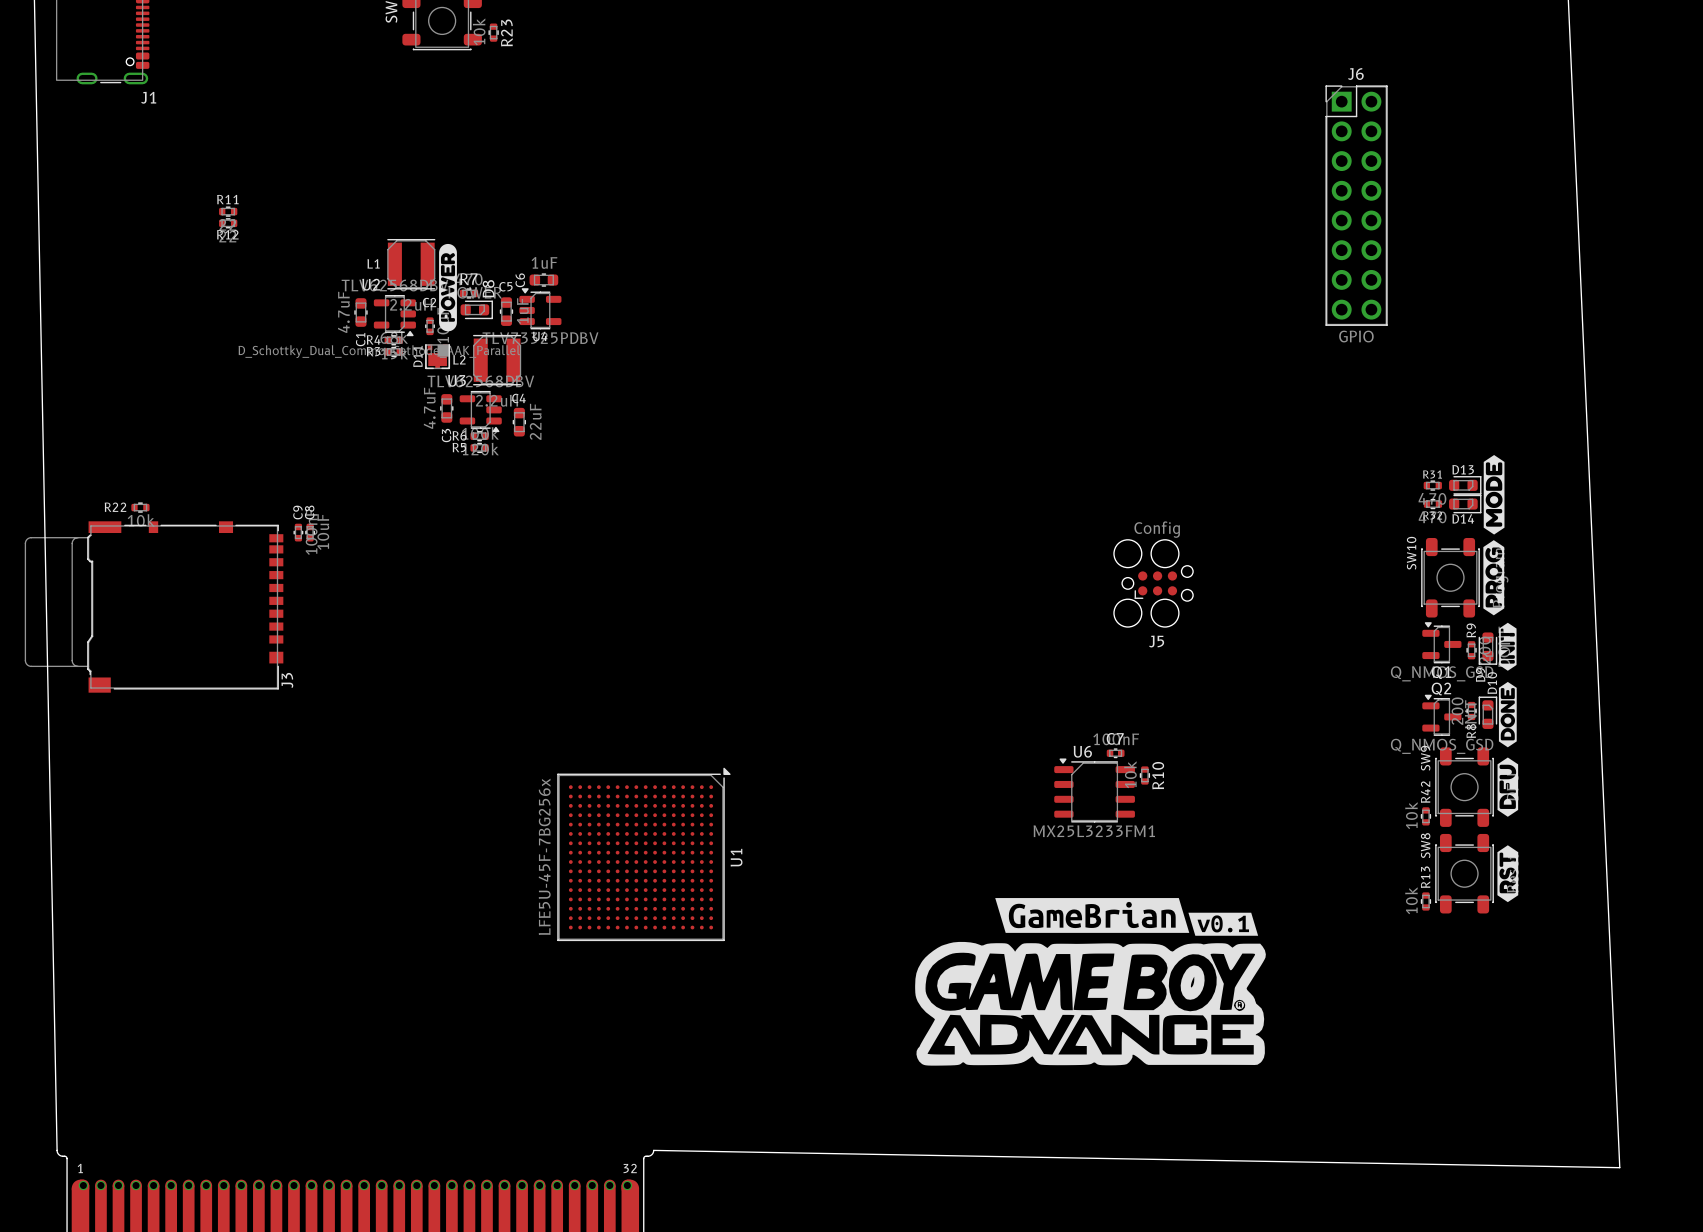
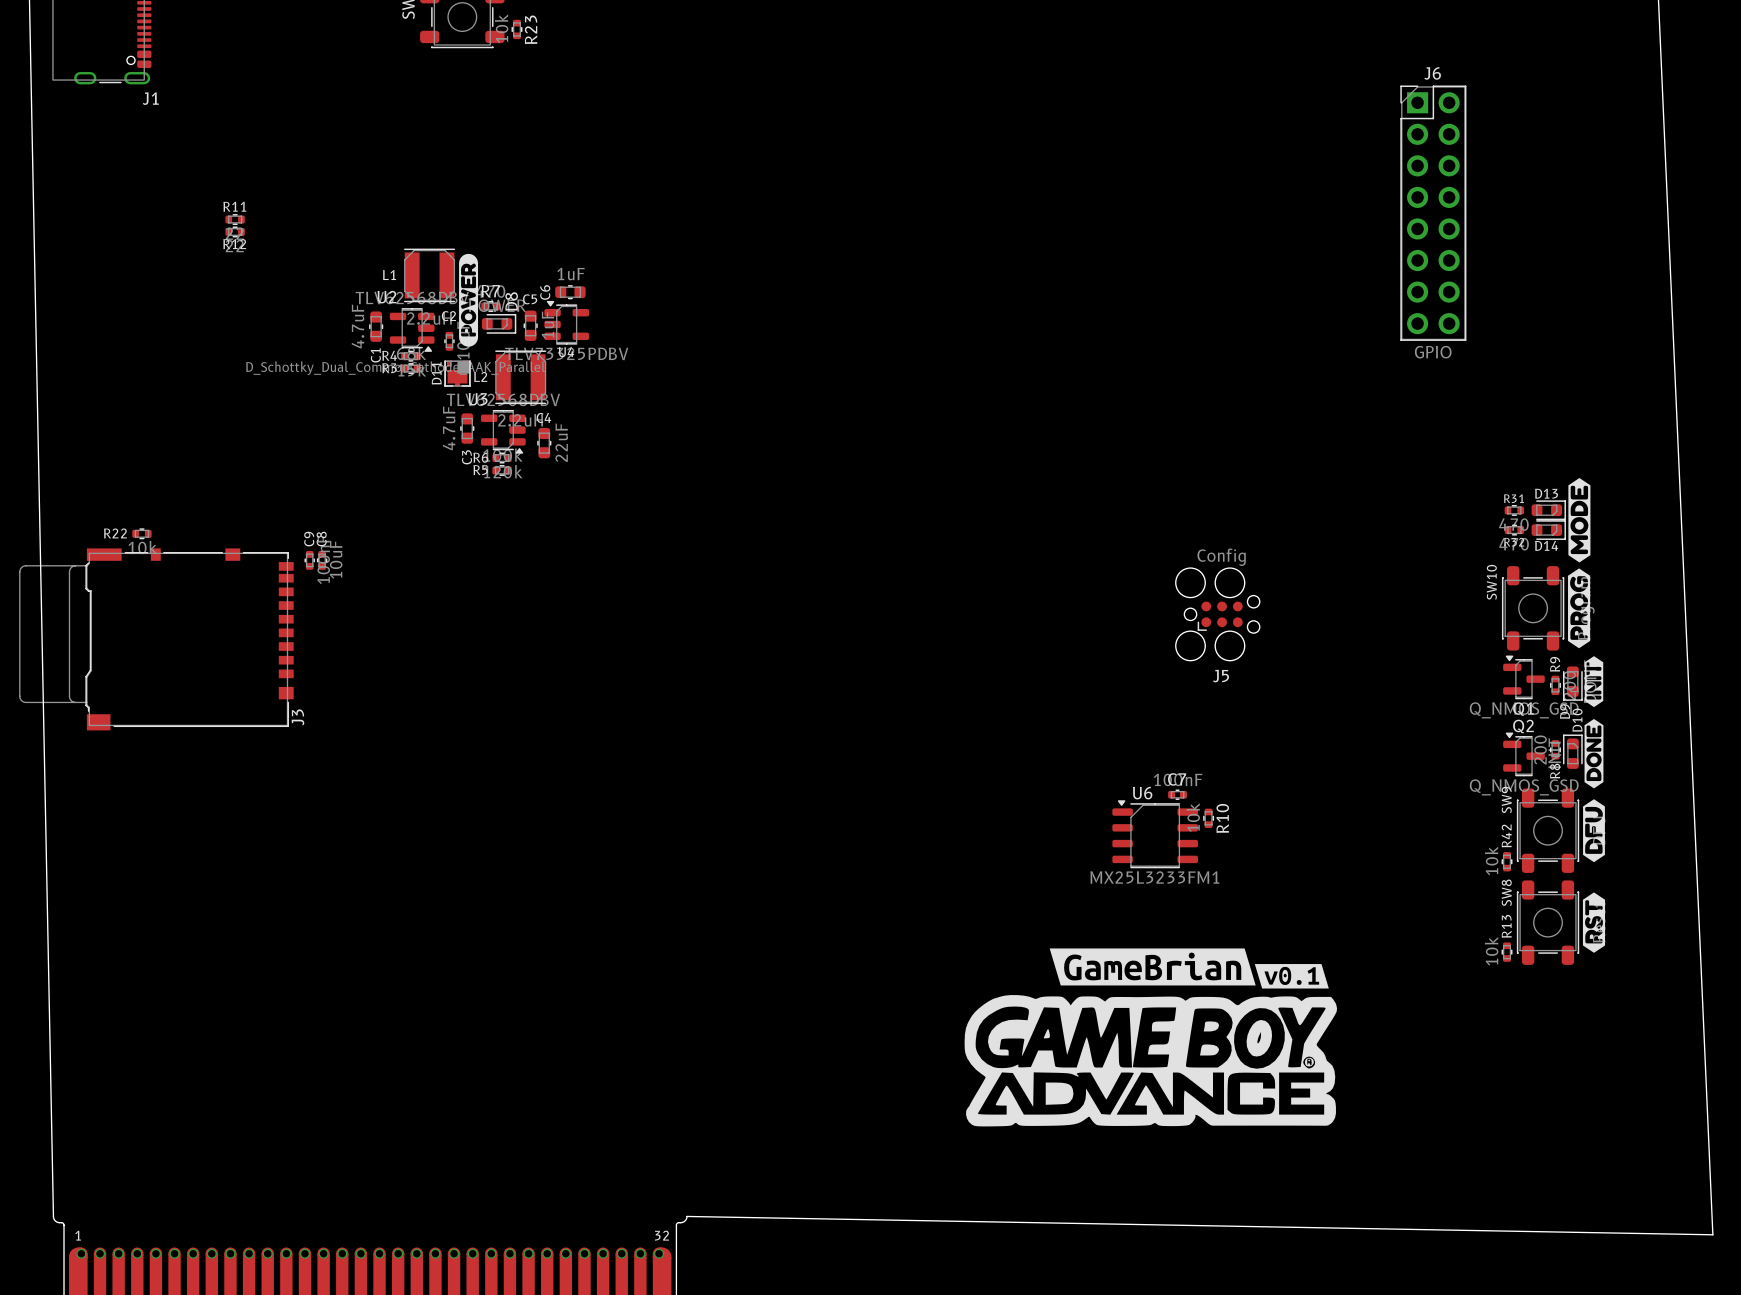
U1: LFE5U-45F-7BG256x (643, 854) -> none

